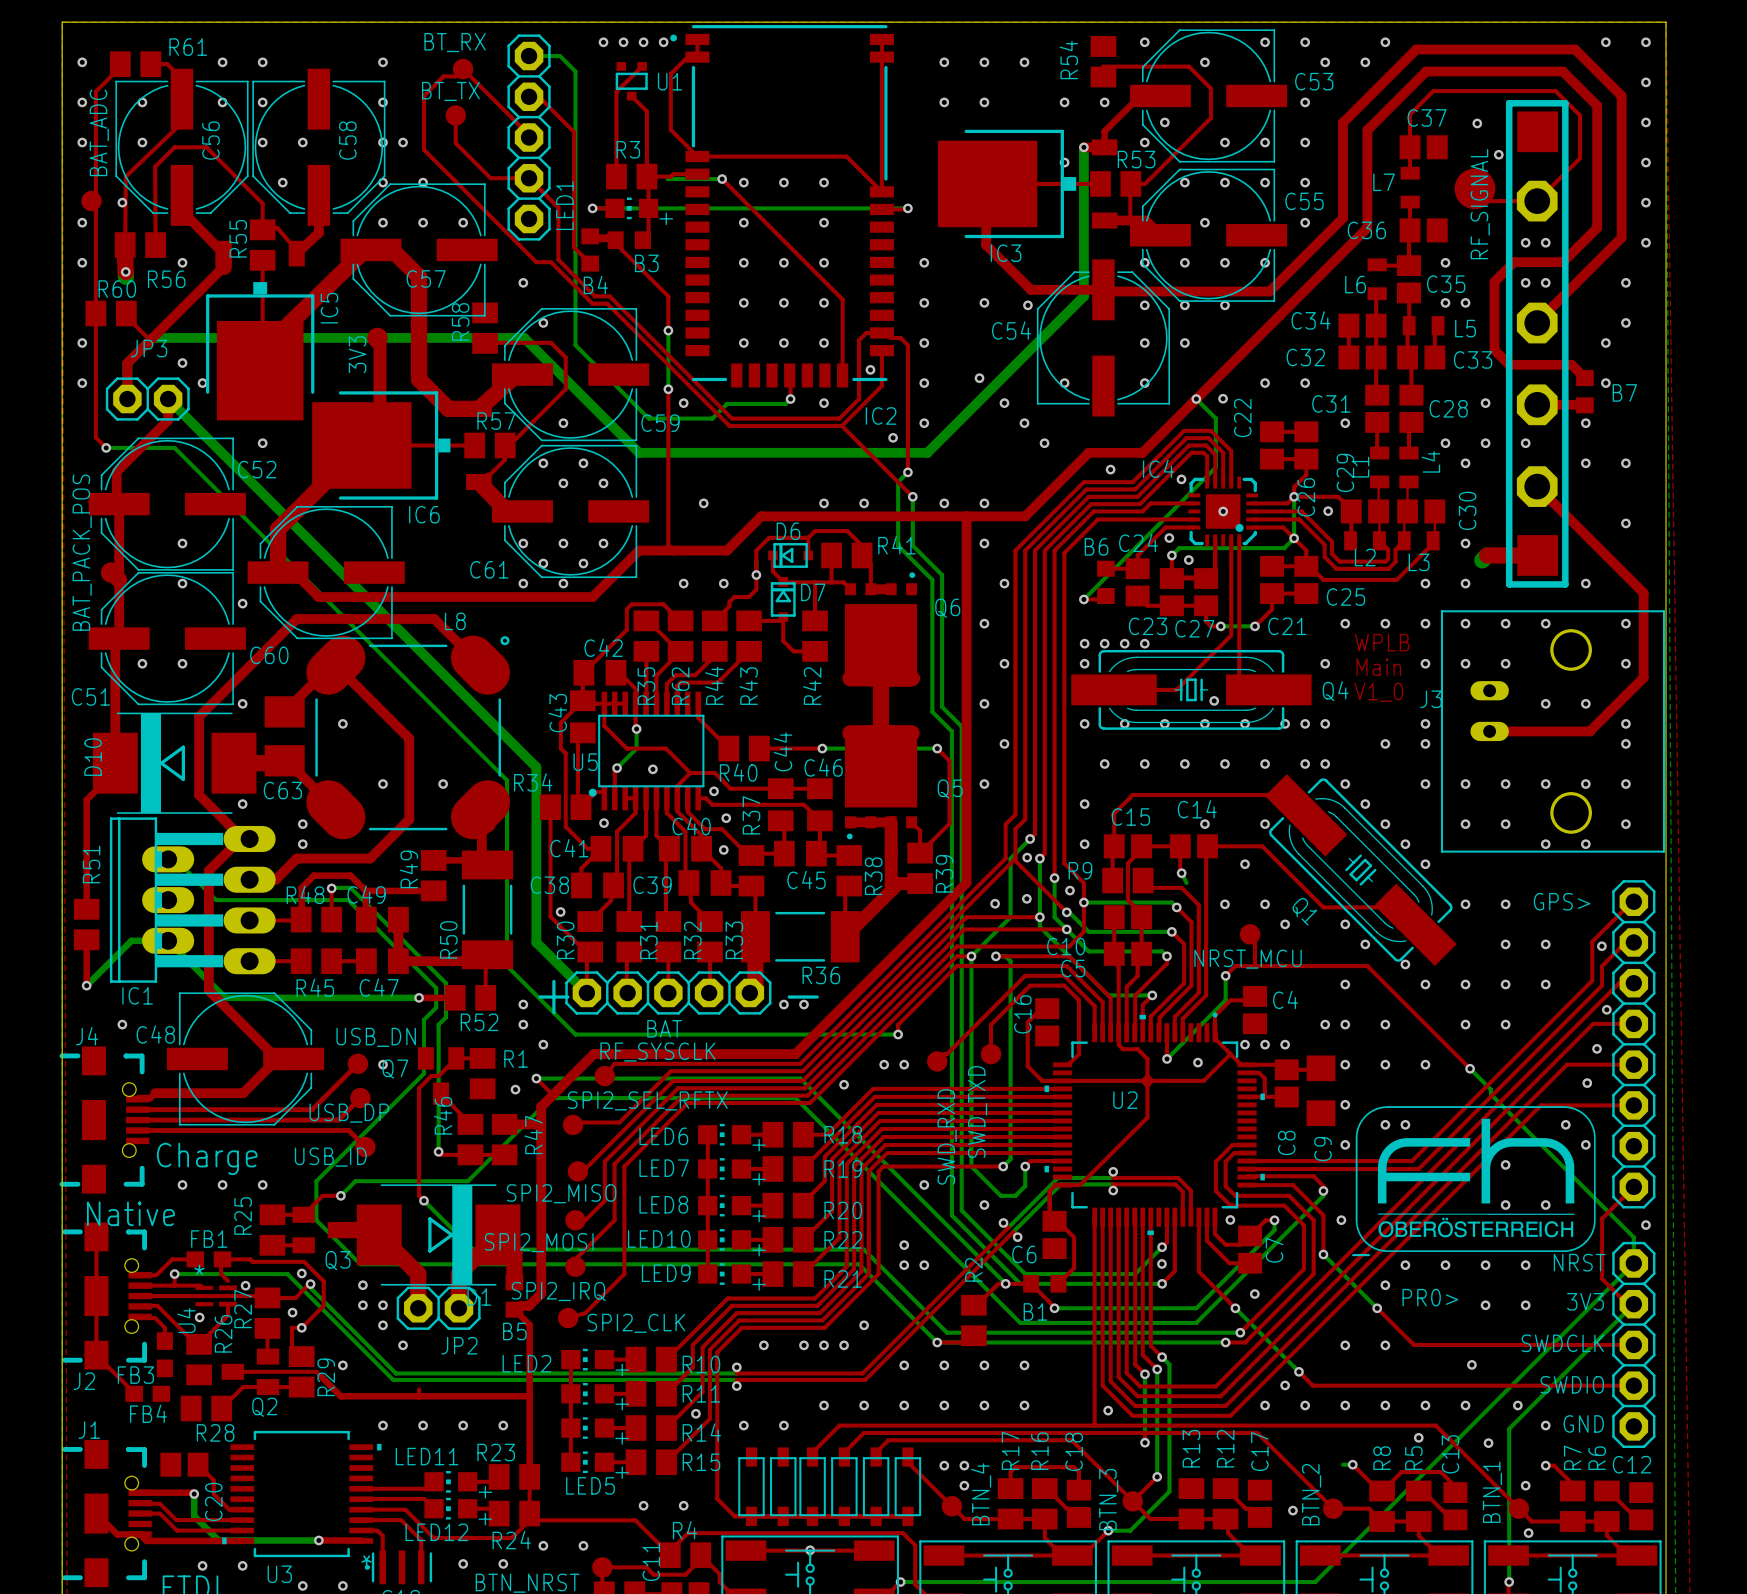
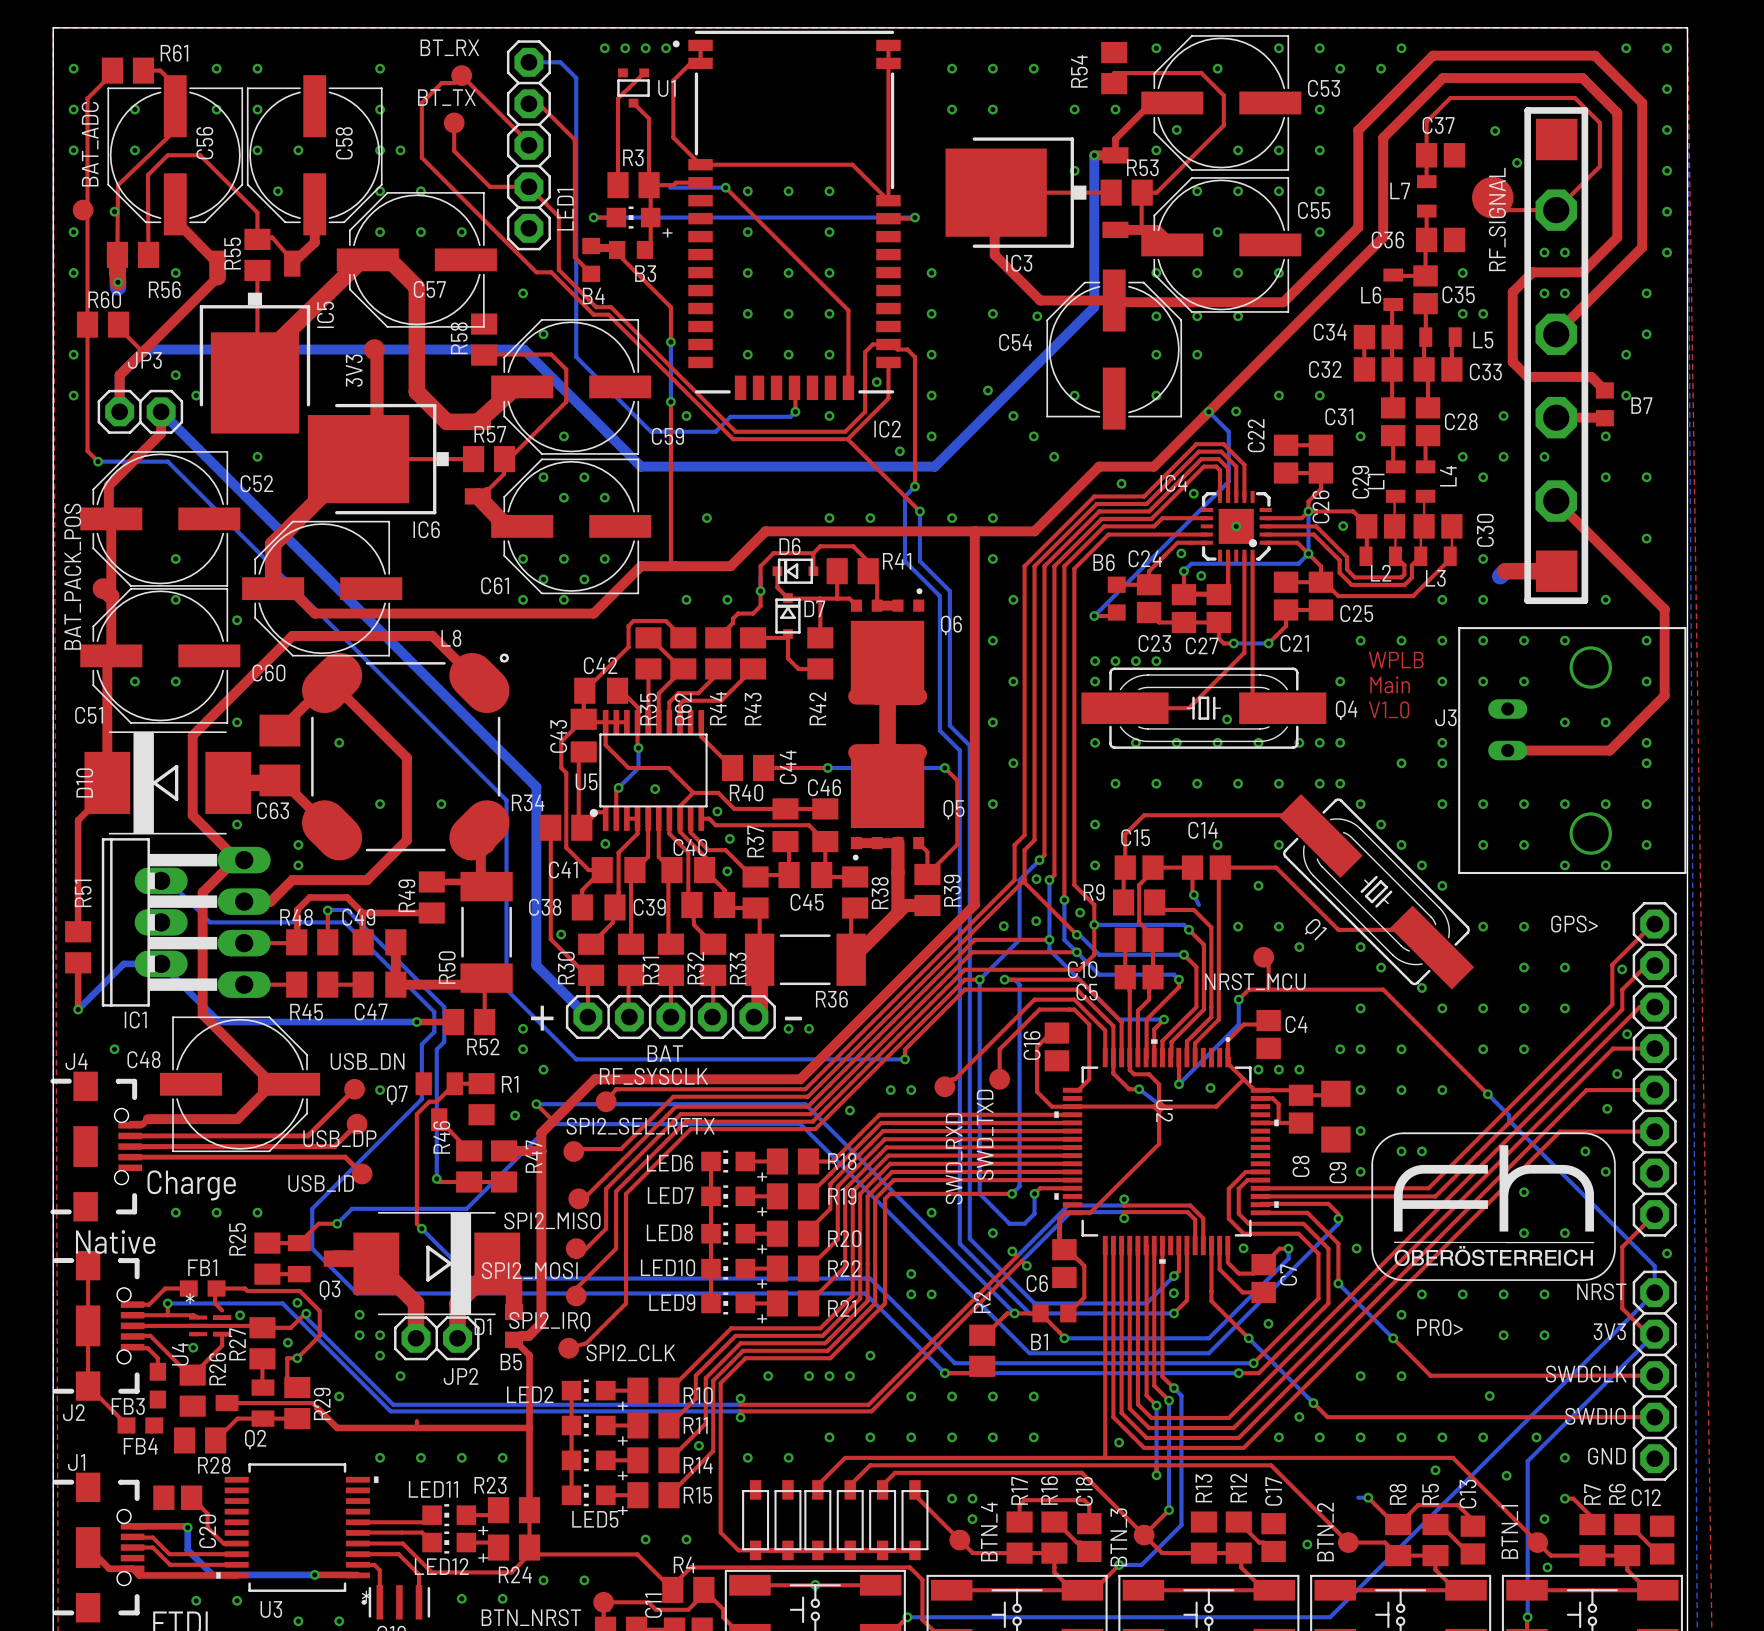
top track: none -> (1113, 1057) (1113, 1073) (1129, 1089) (1139, 1089)
bottom track: none -> (1139, 1089) (1159, 1104)
via: none -> (1139, 1089)
U2 name rotation: 0° (1125, 1100) -> 90° clockwise (1164, 1110)

